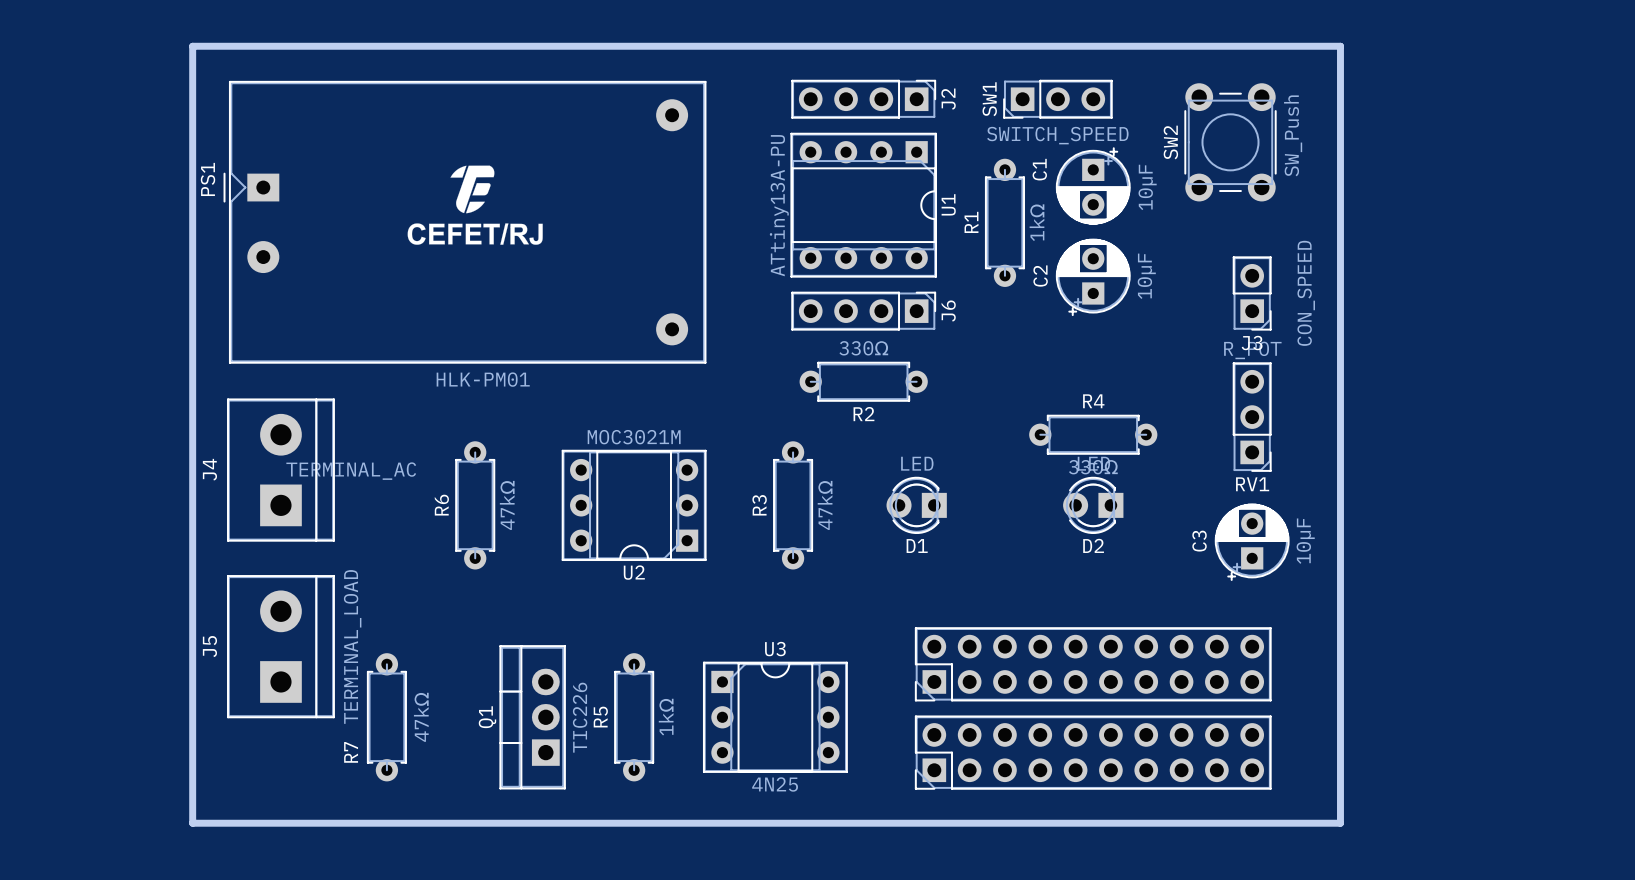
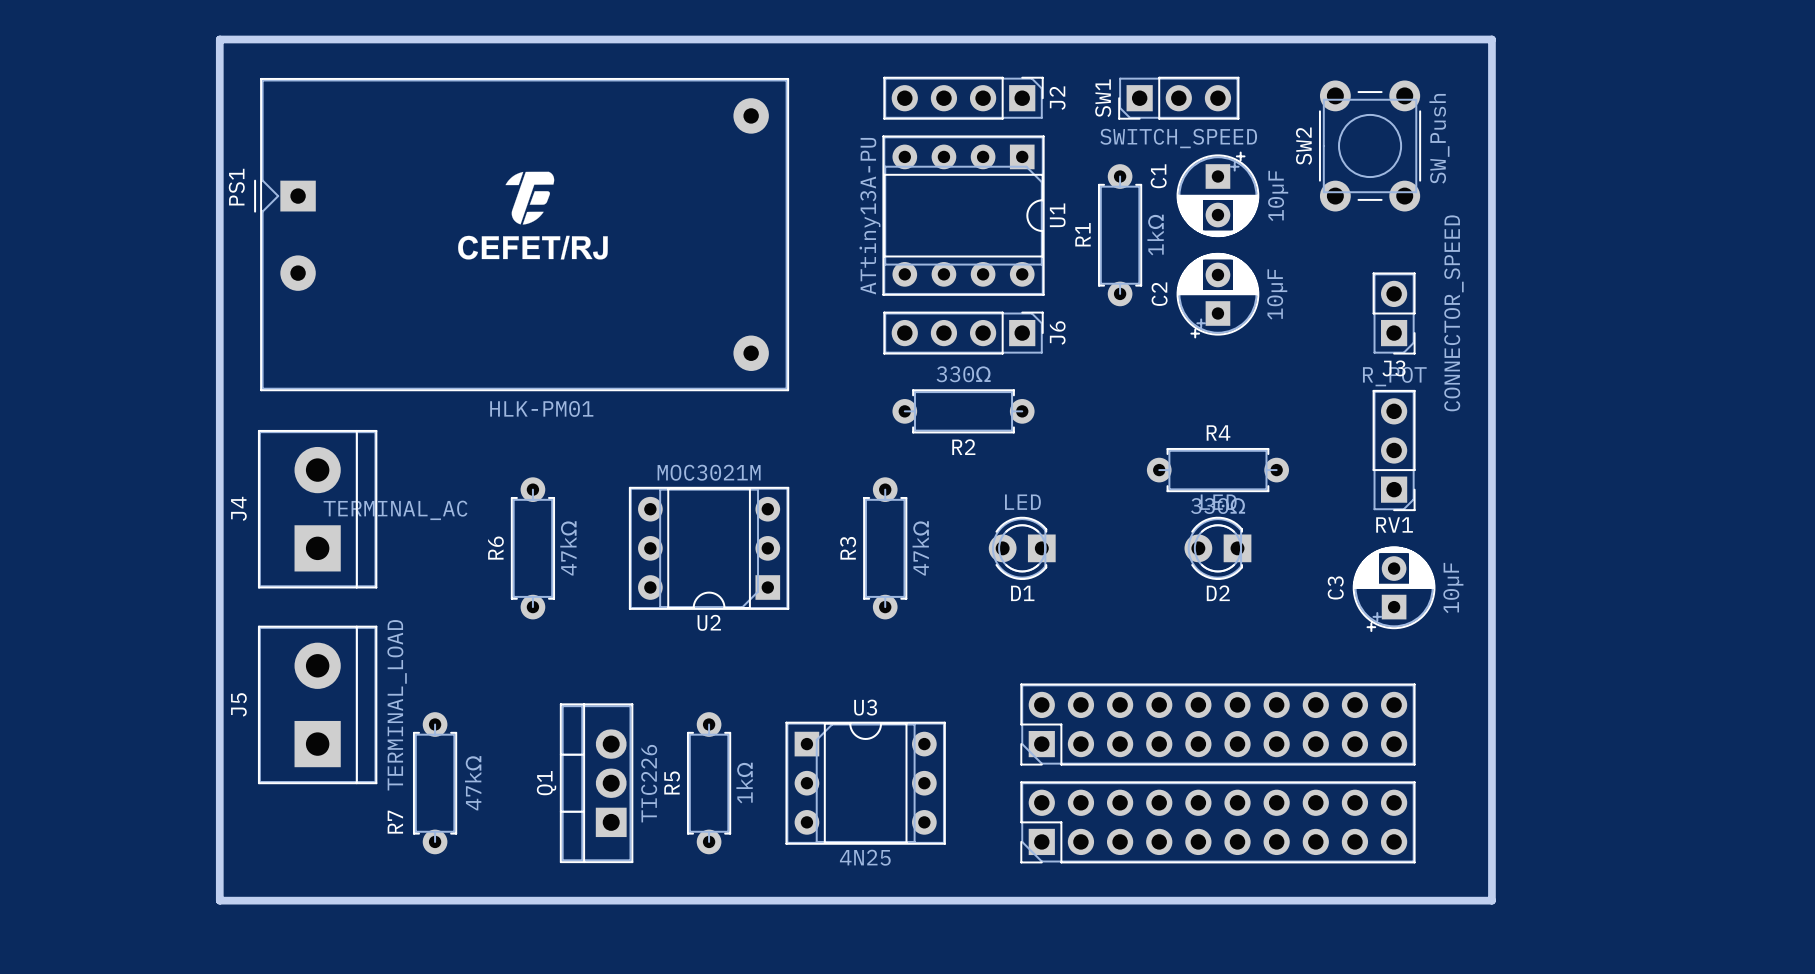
J3 value: CON_SPEED (1306, 293) -> CONNECTOR_SPEED (1453, 313)

